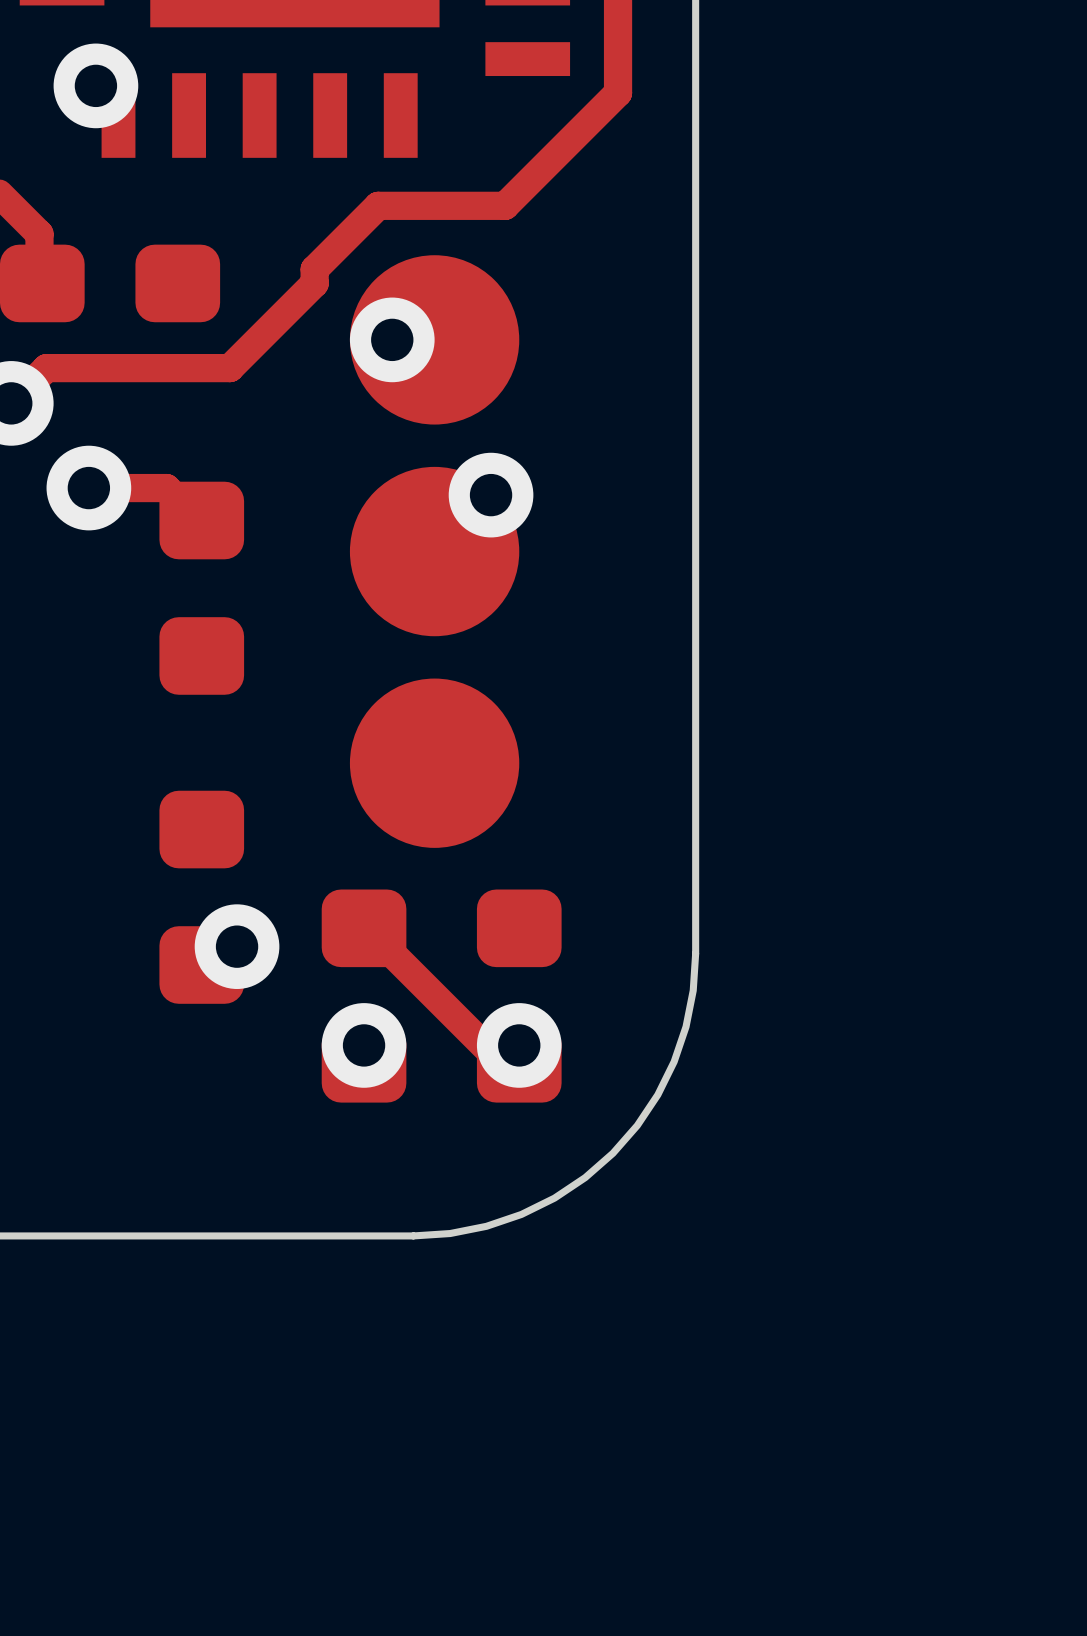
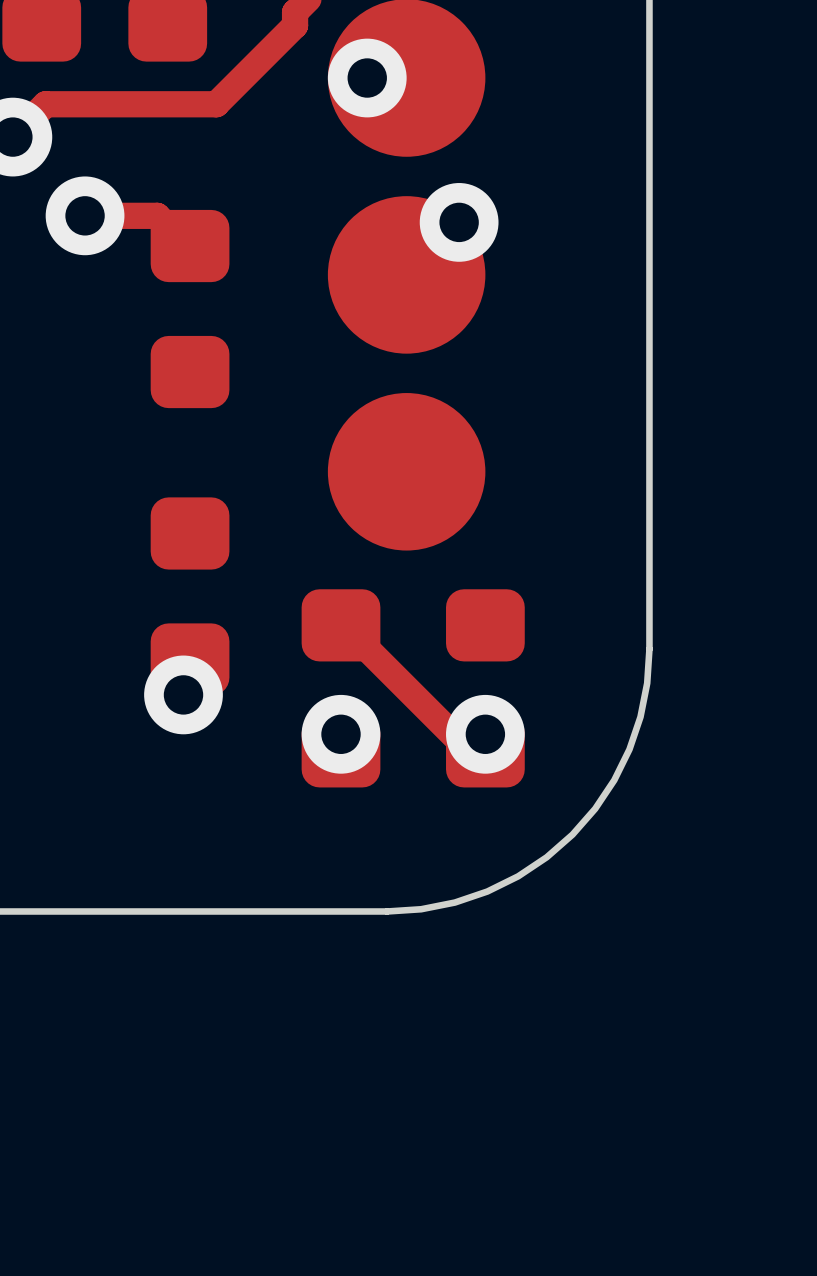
via position: (237, 946) -> (183, 694)

